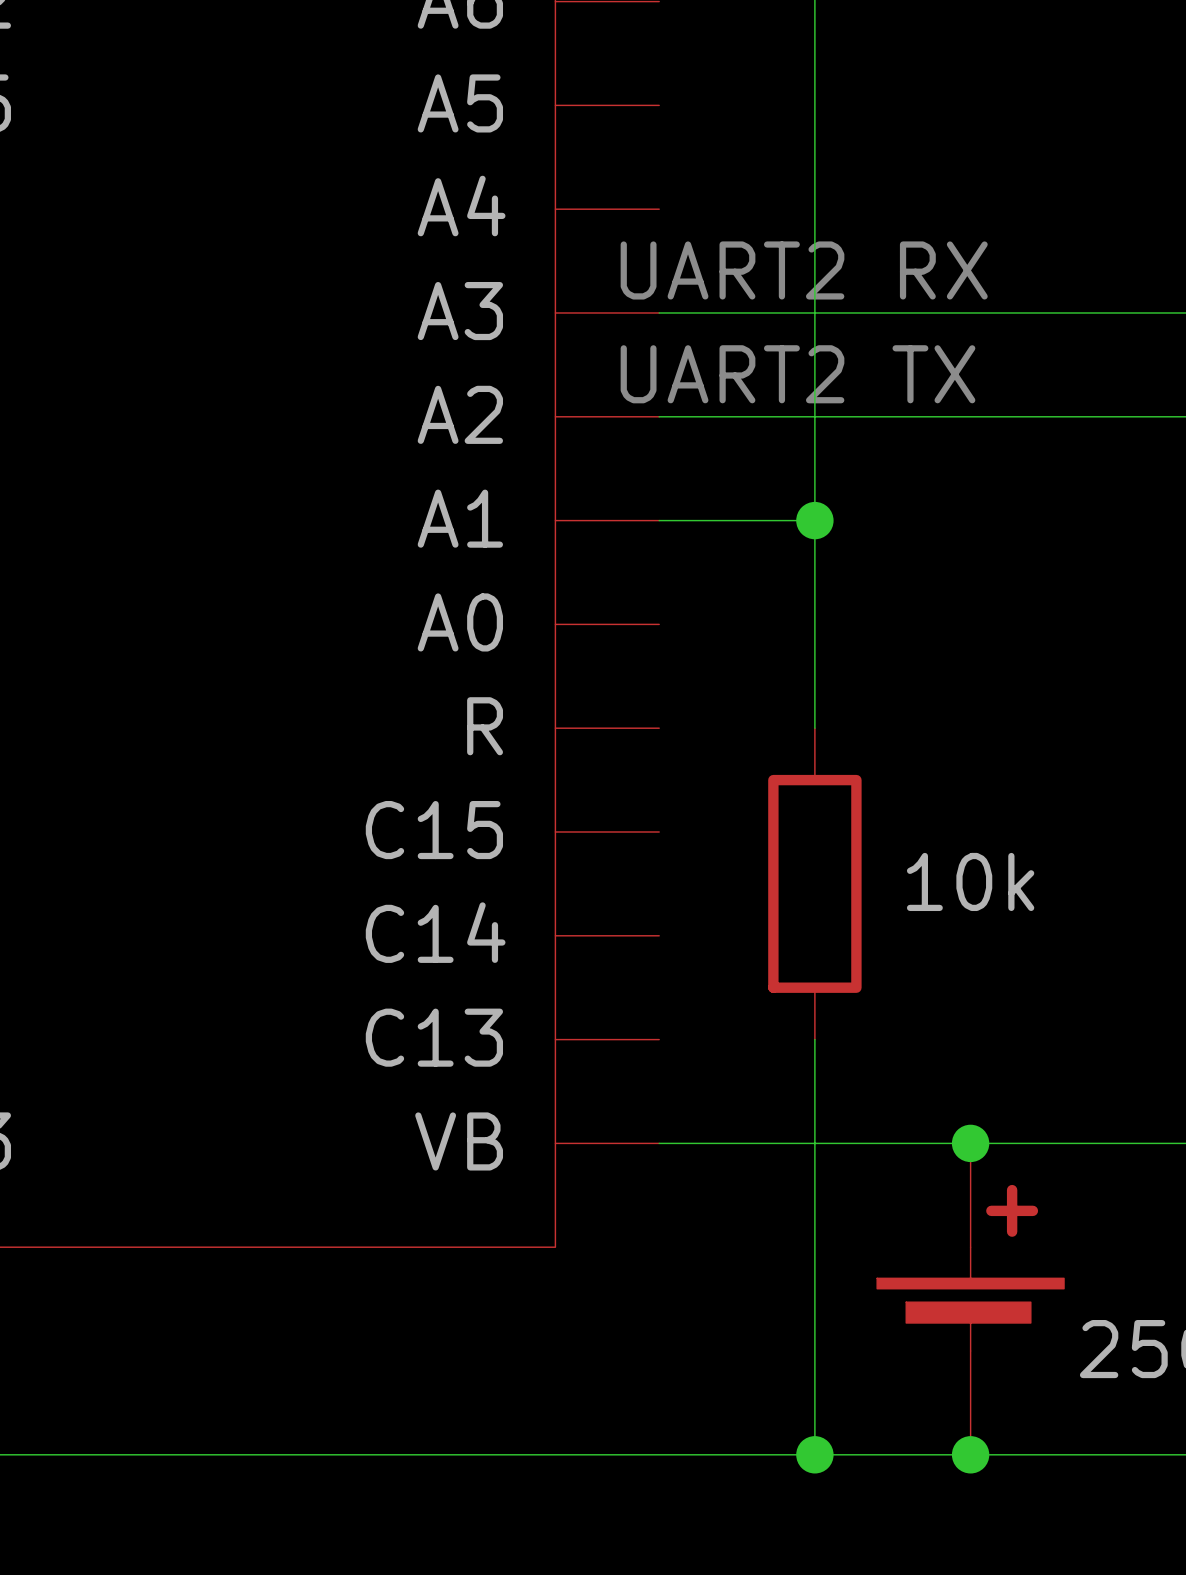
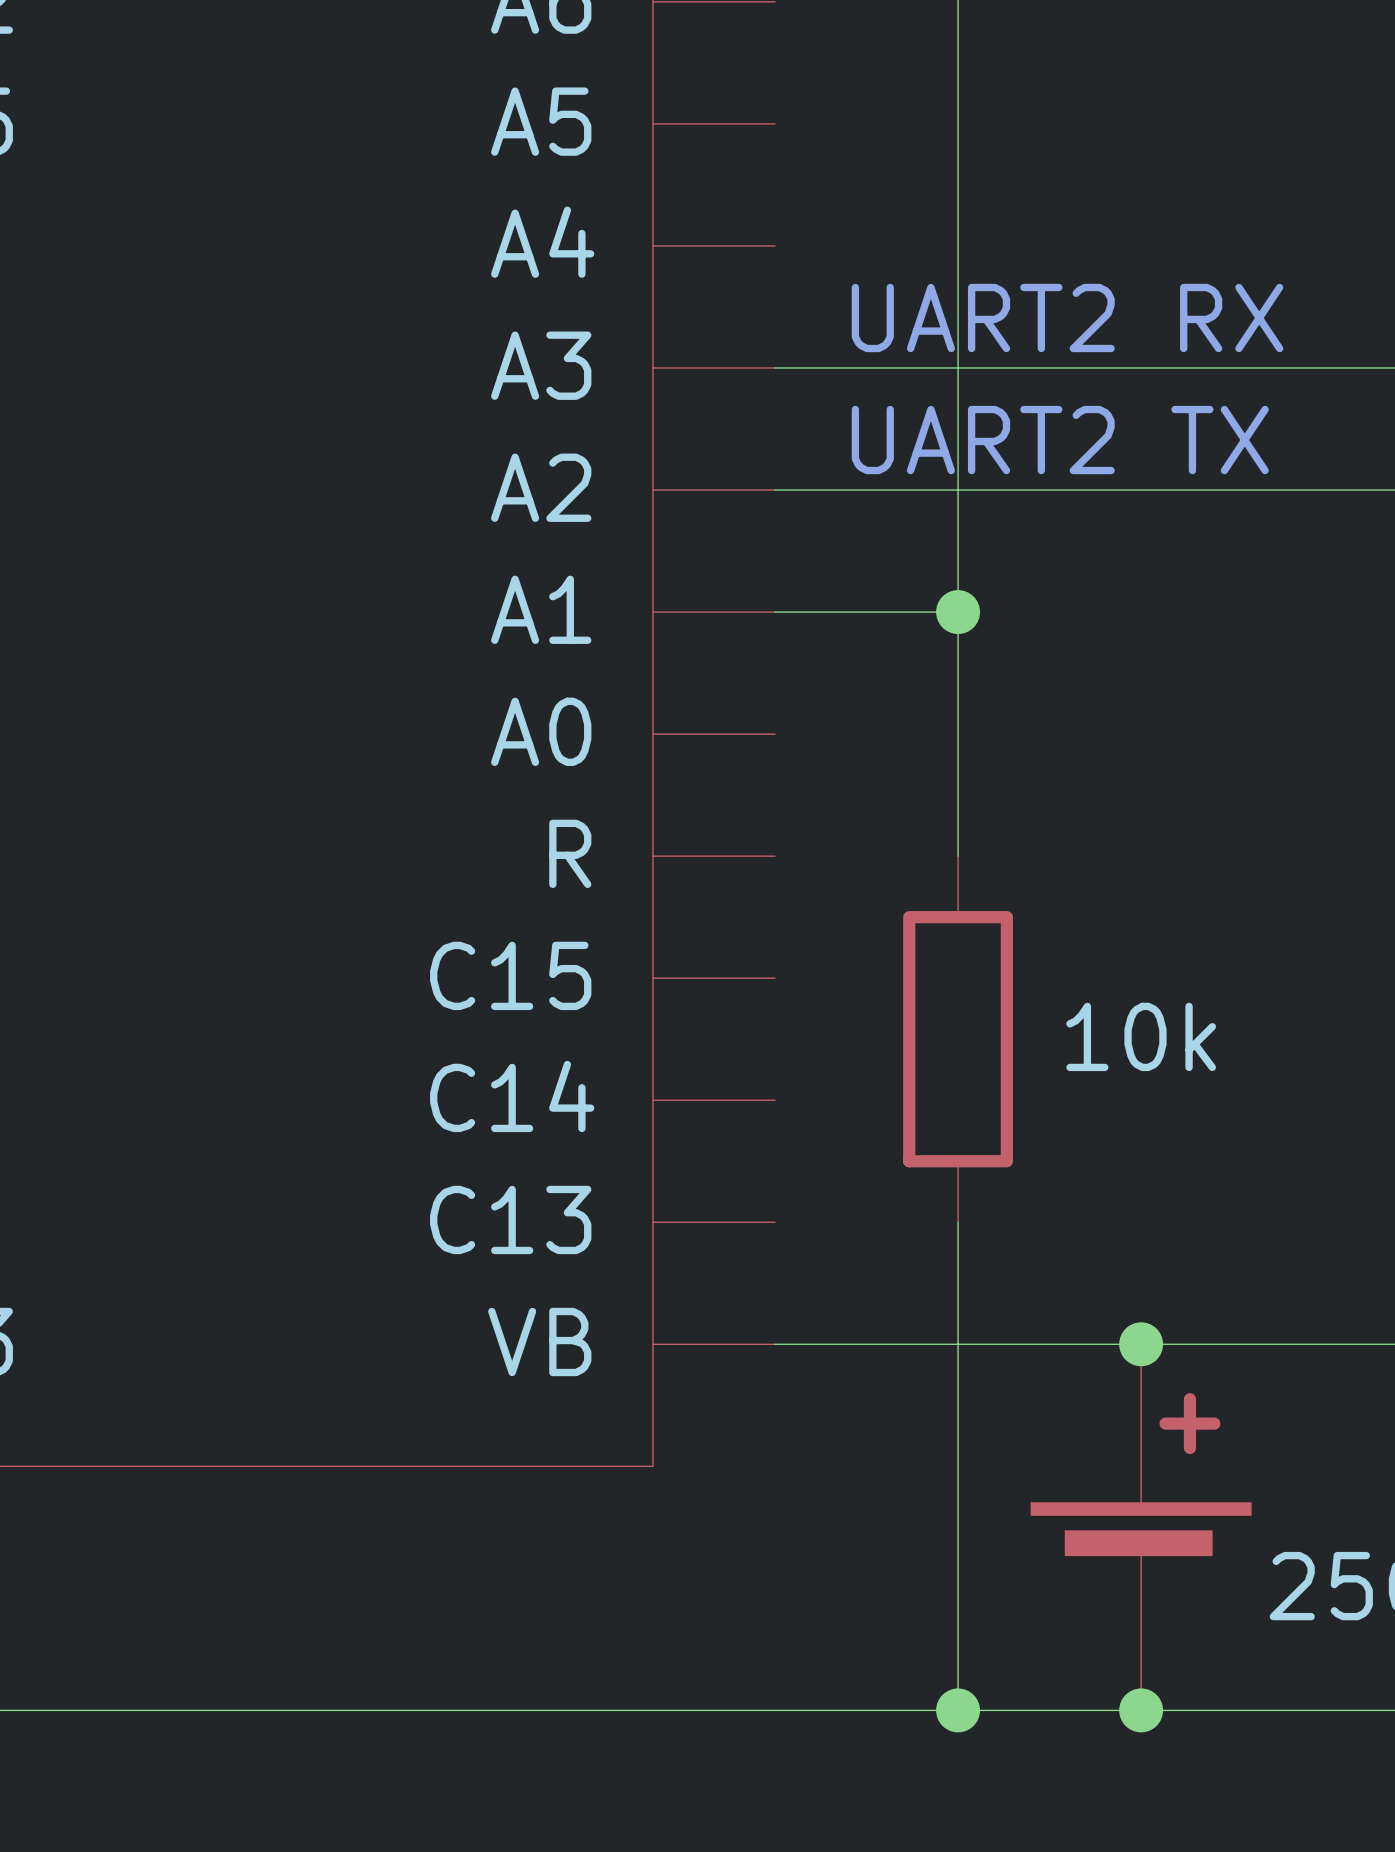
text position: UART2 RX (804, 270) -> UART2 RX (1067, 317)
text position: UART2 TX (797, 374) -> UART2 TX (1060, 440)

